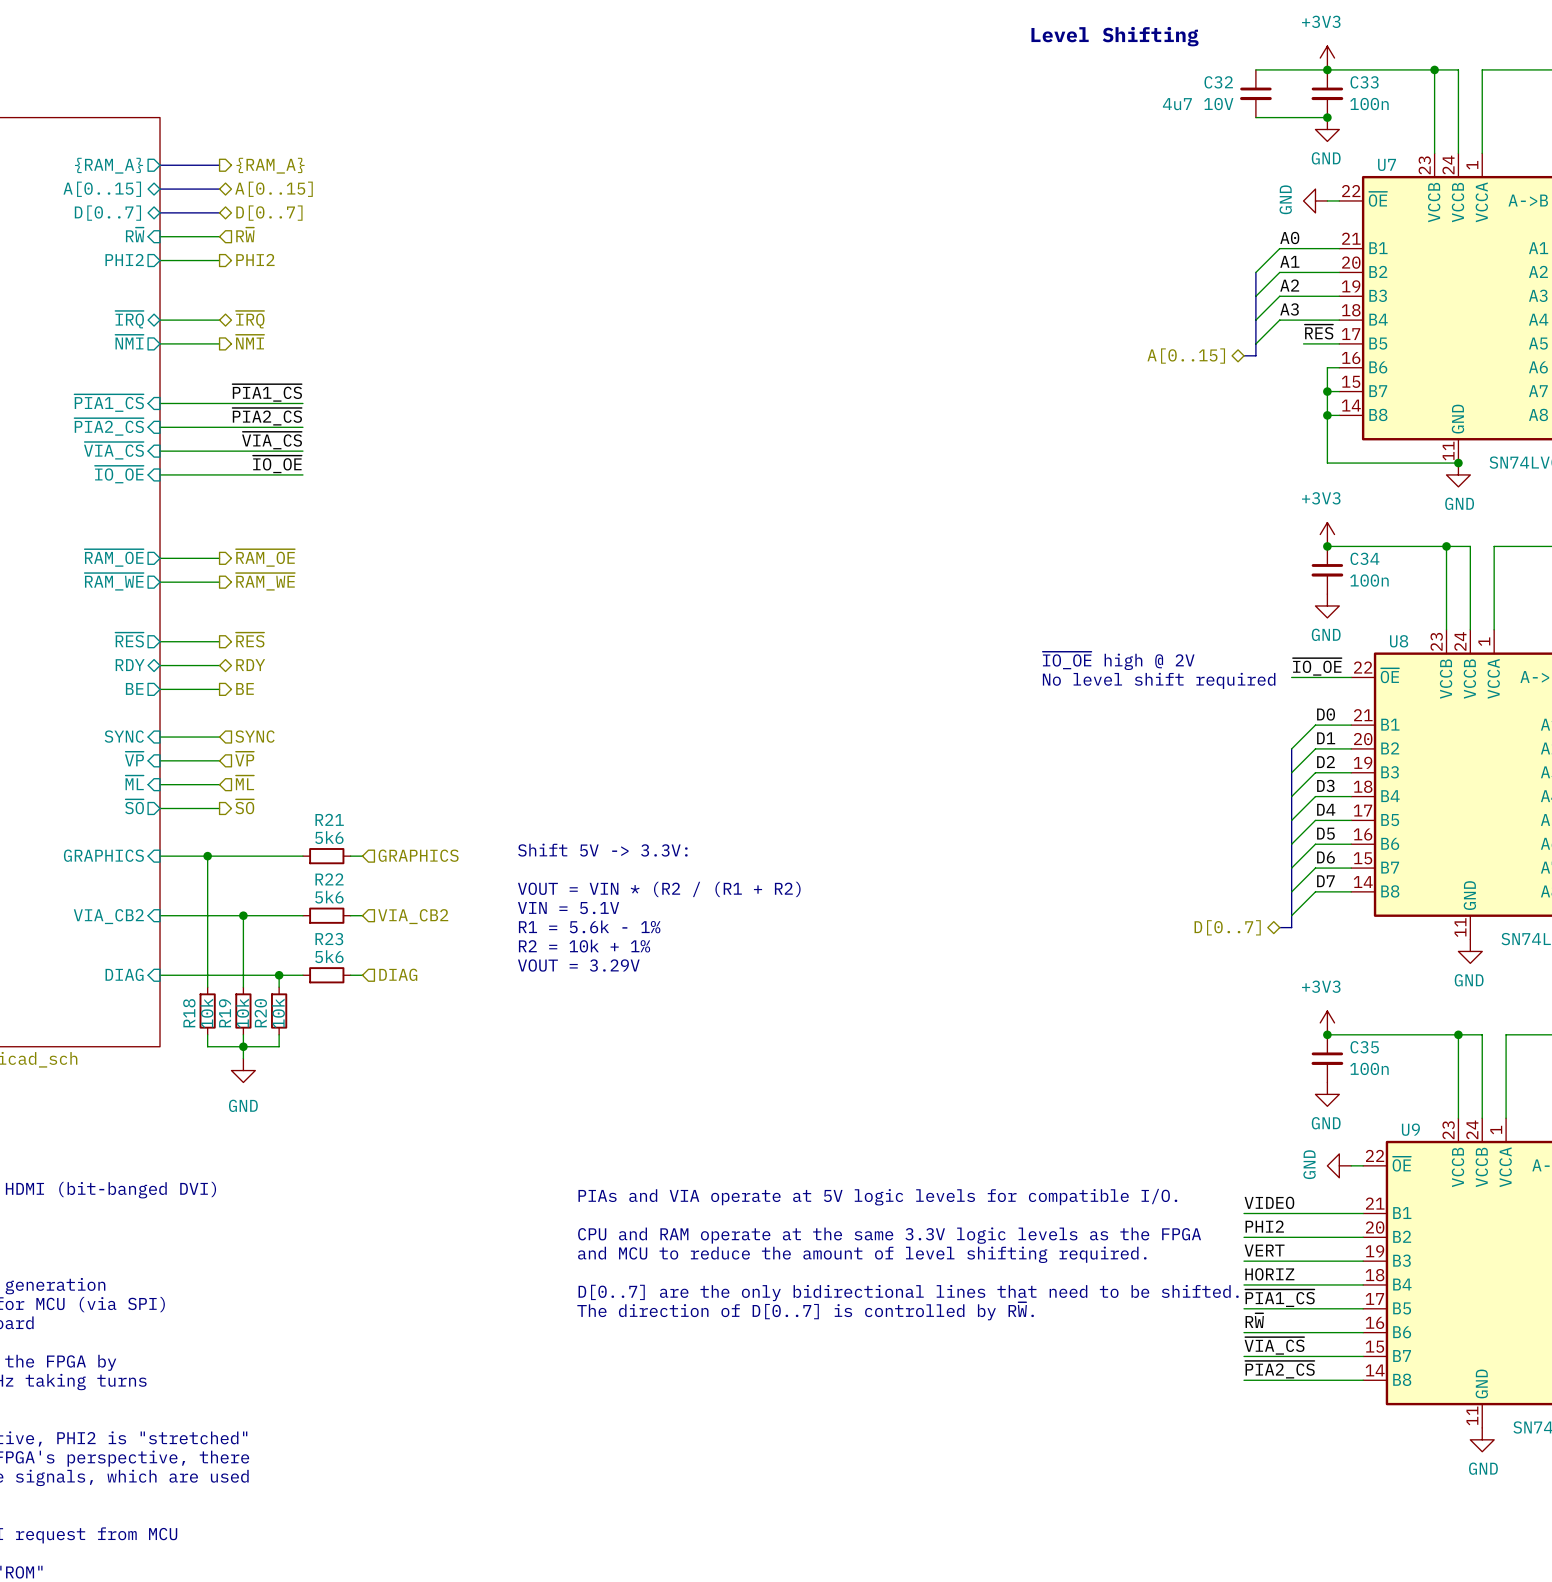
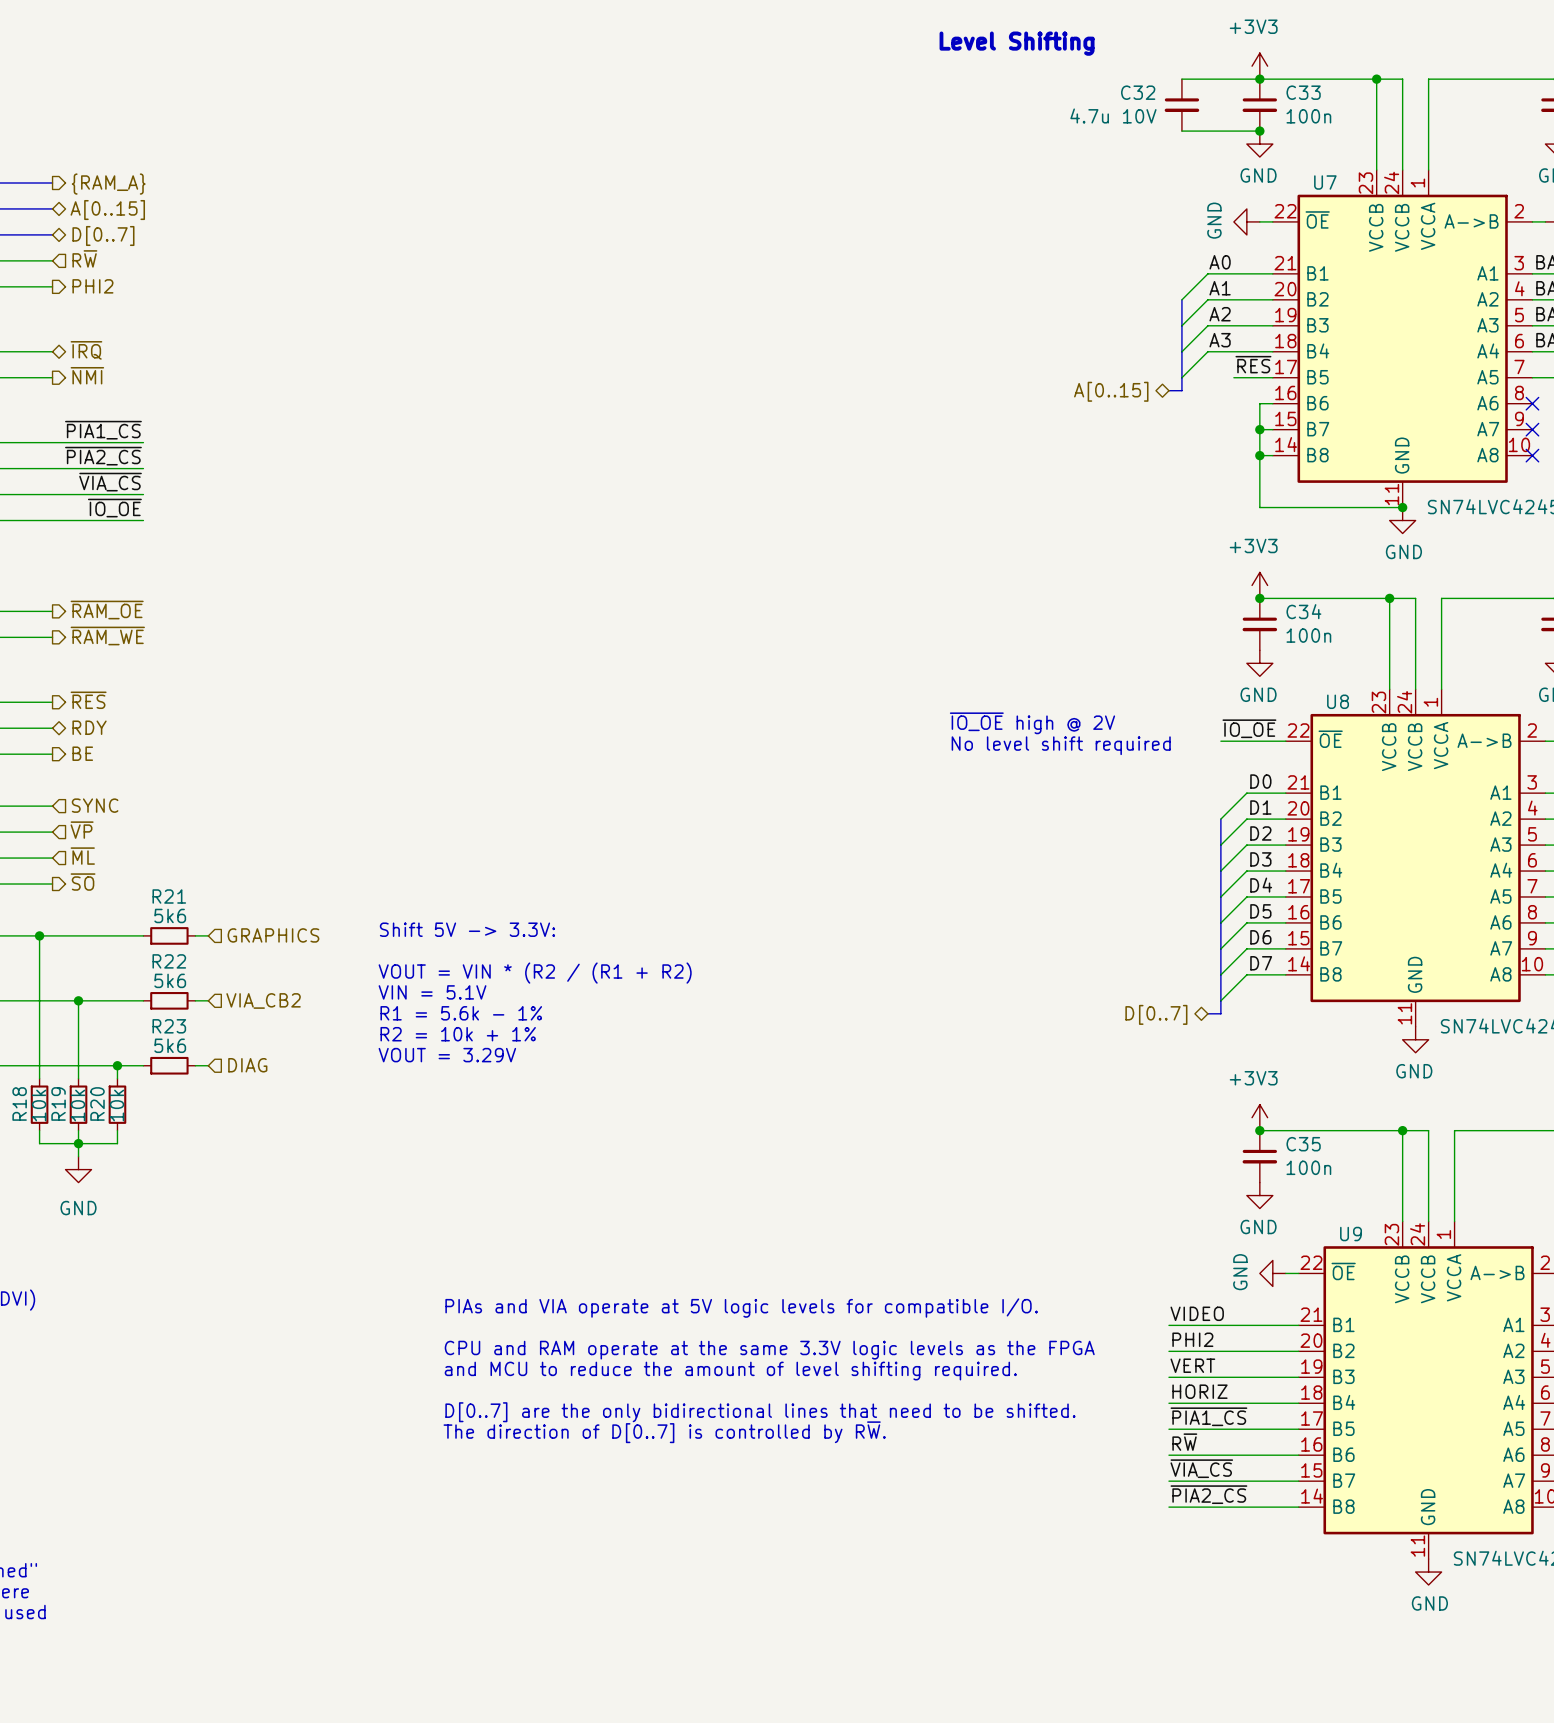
C32 value: 4u7 10V (1198, 104) -> 4.7u 10V (1113, 116)

